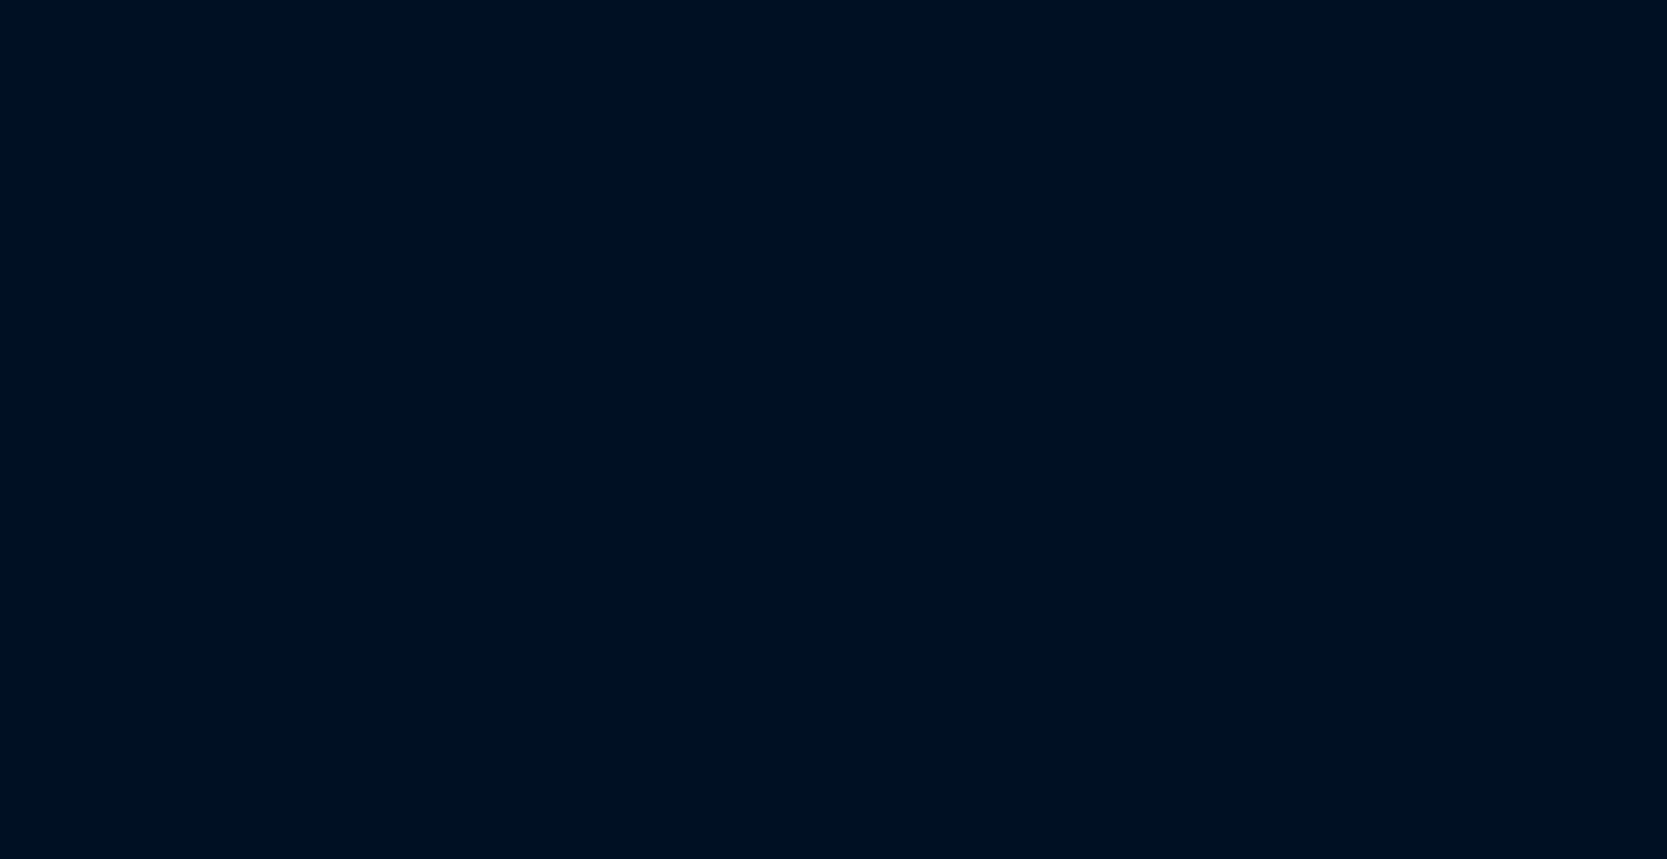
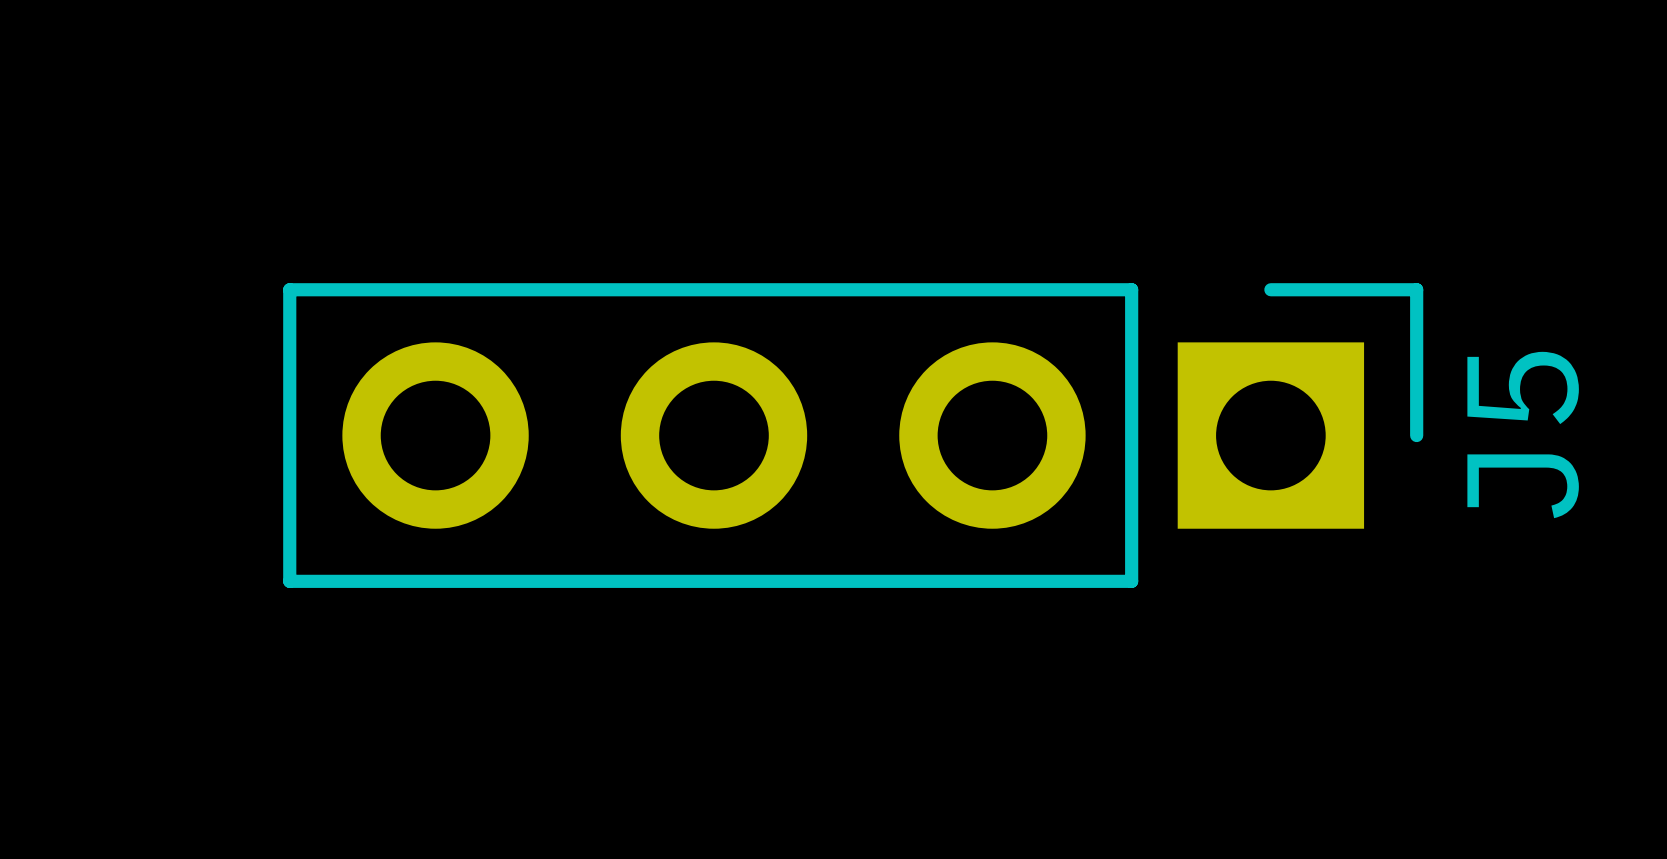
J5: none -> (853, 435)

